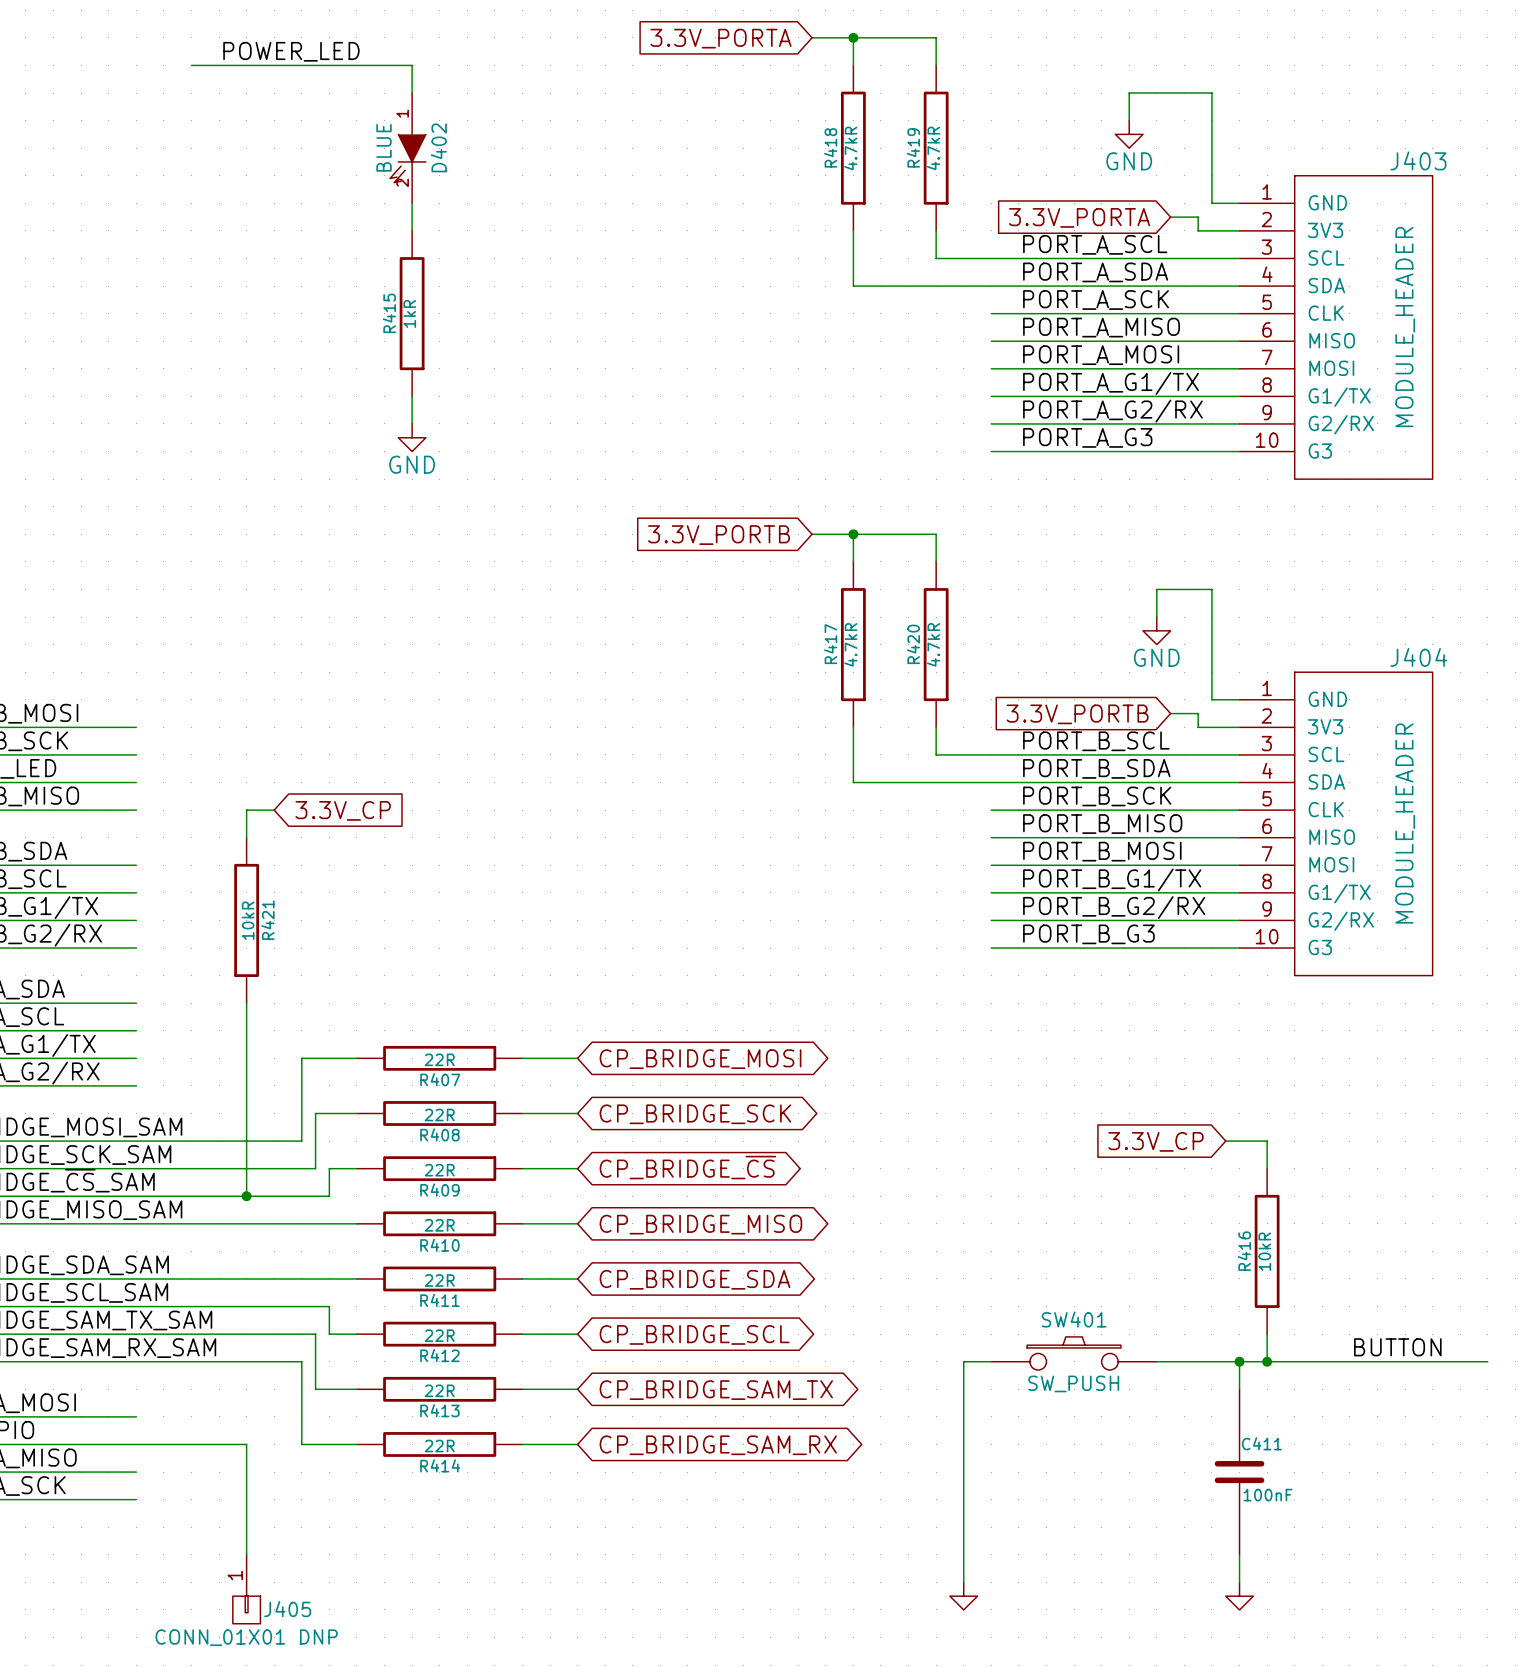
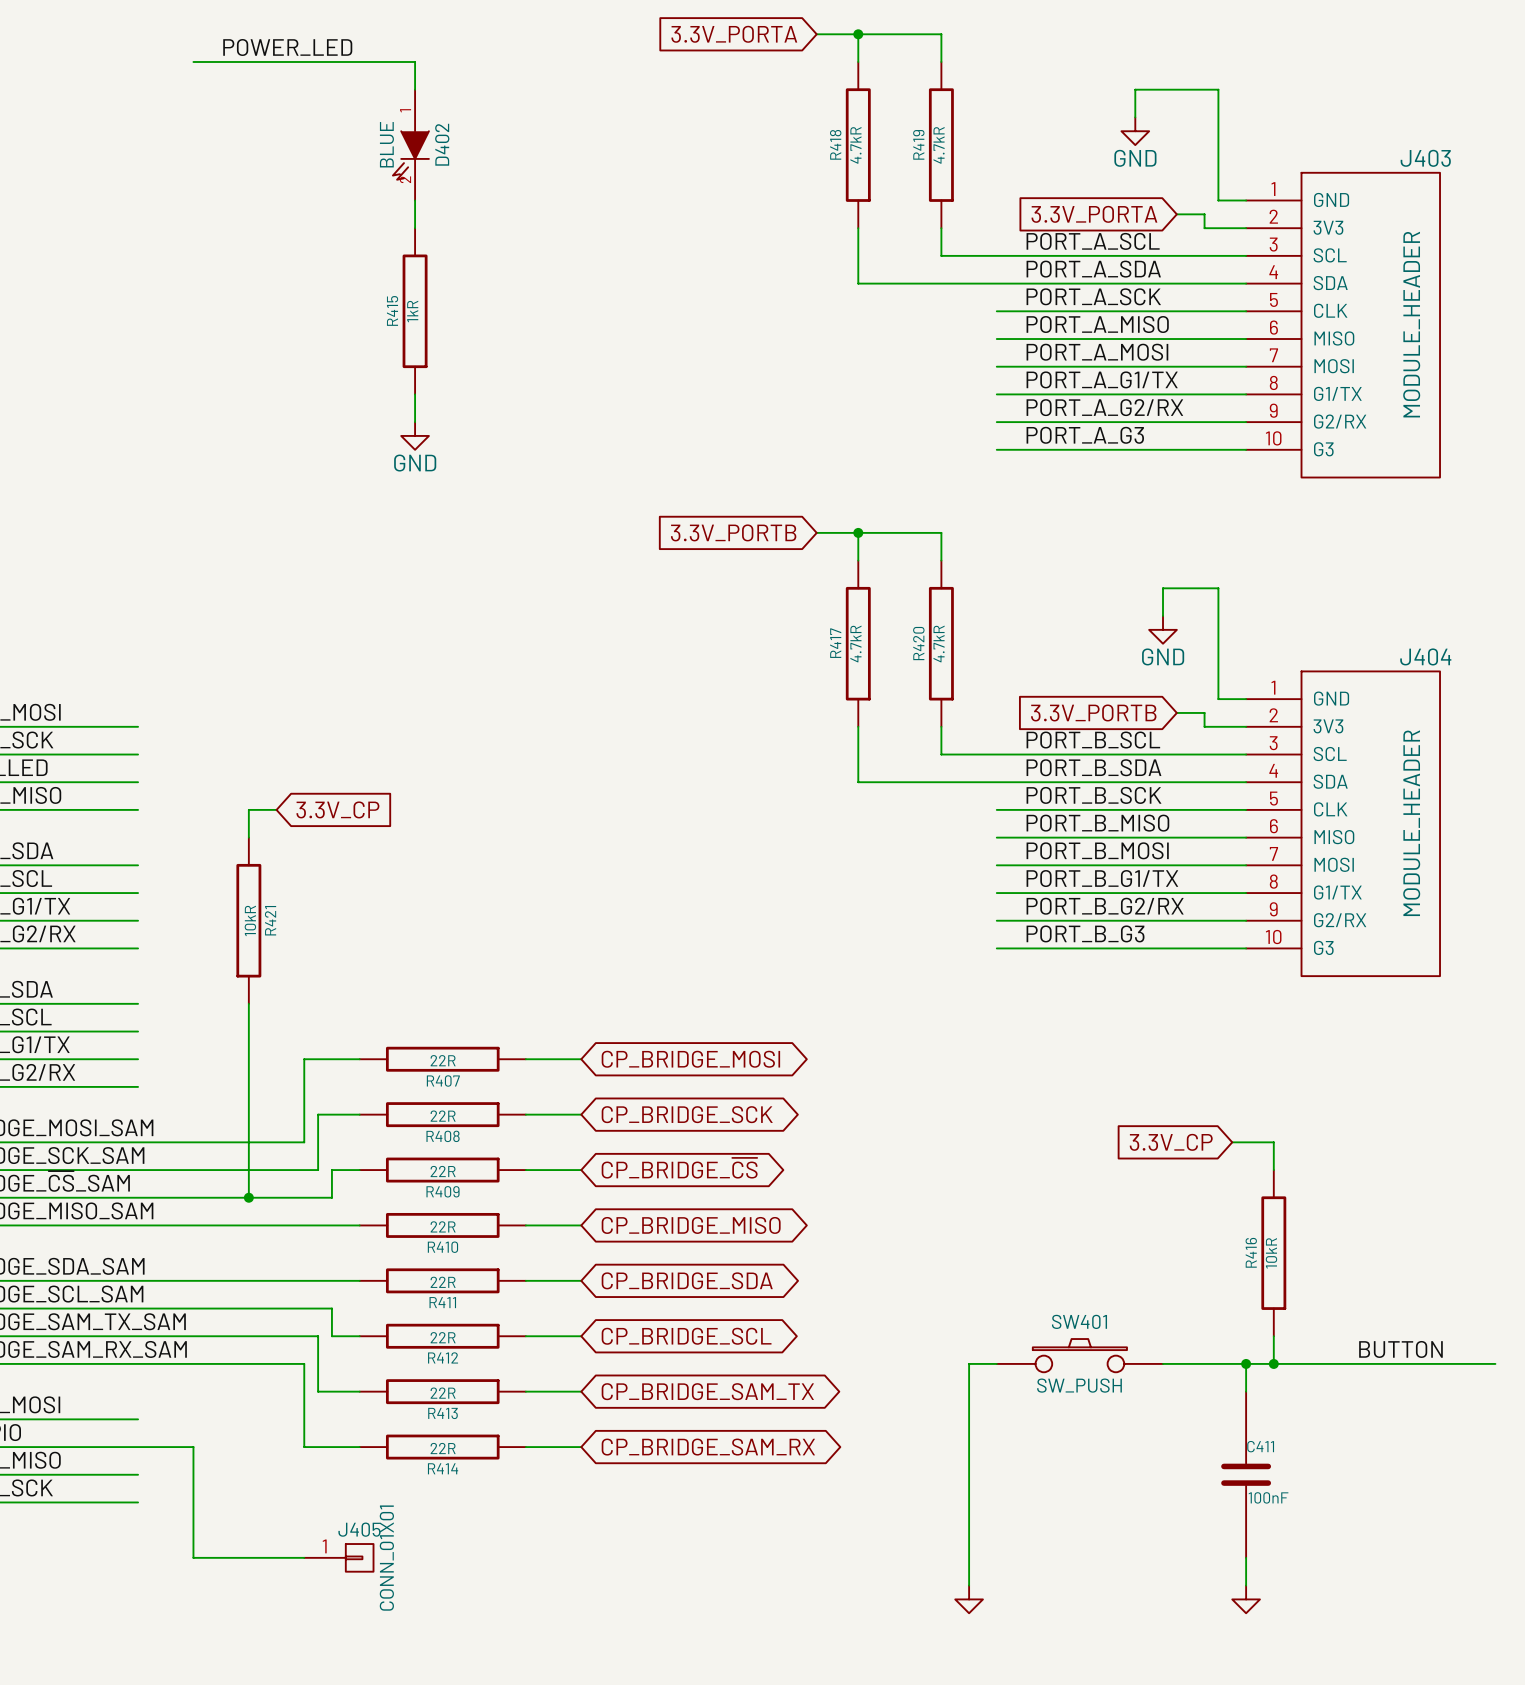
wire: (191, 1444) (246, 1444) (246, 1554) -> (193, 1447) (193, 1557) (304, 1557)
J405 position: (246, 1589) -> (338, 1557)
J405 rotation: 0° (246, 1609) -> 90° counterclockwise (359, 1557)
J405 value: CONN_01X01 DNP (246, 1637) -> CONN_01X01 (386, 1558)

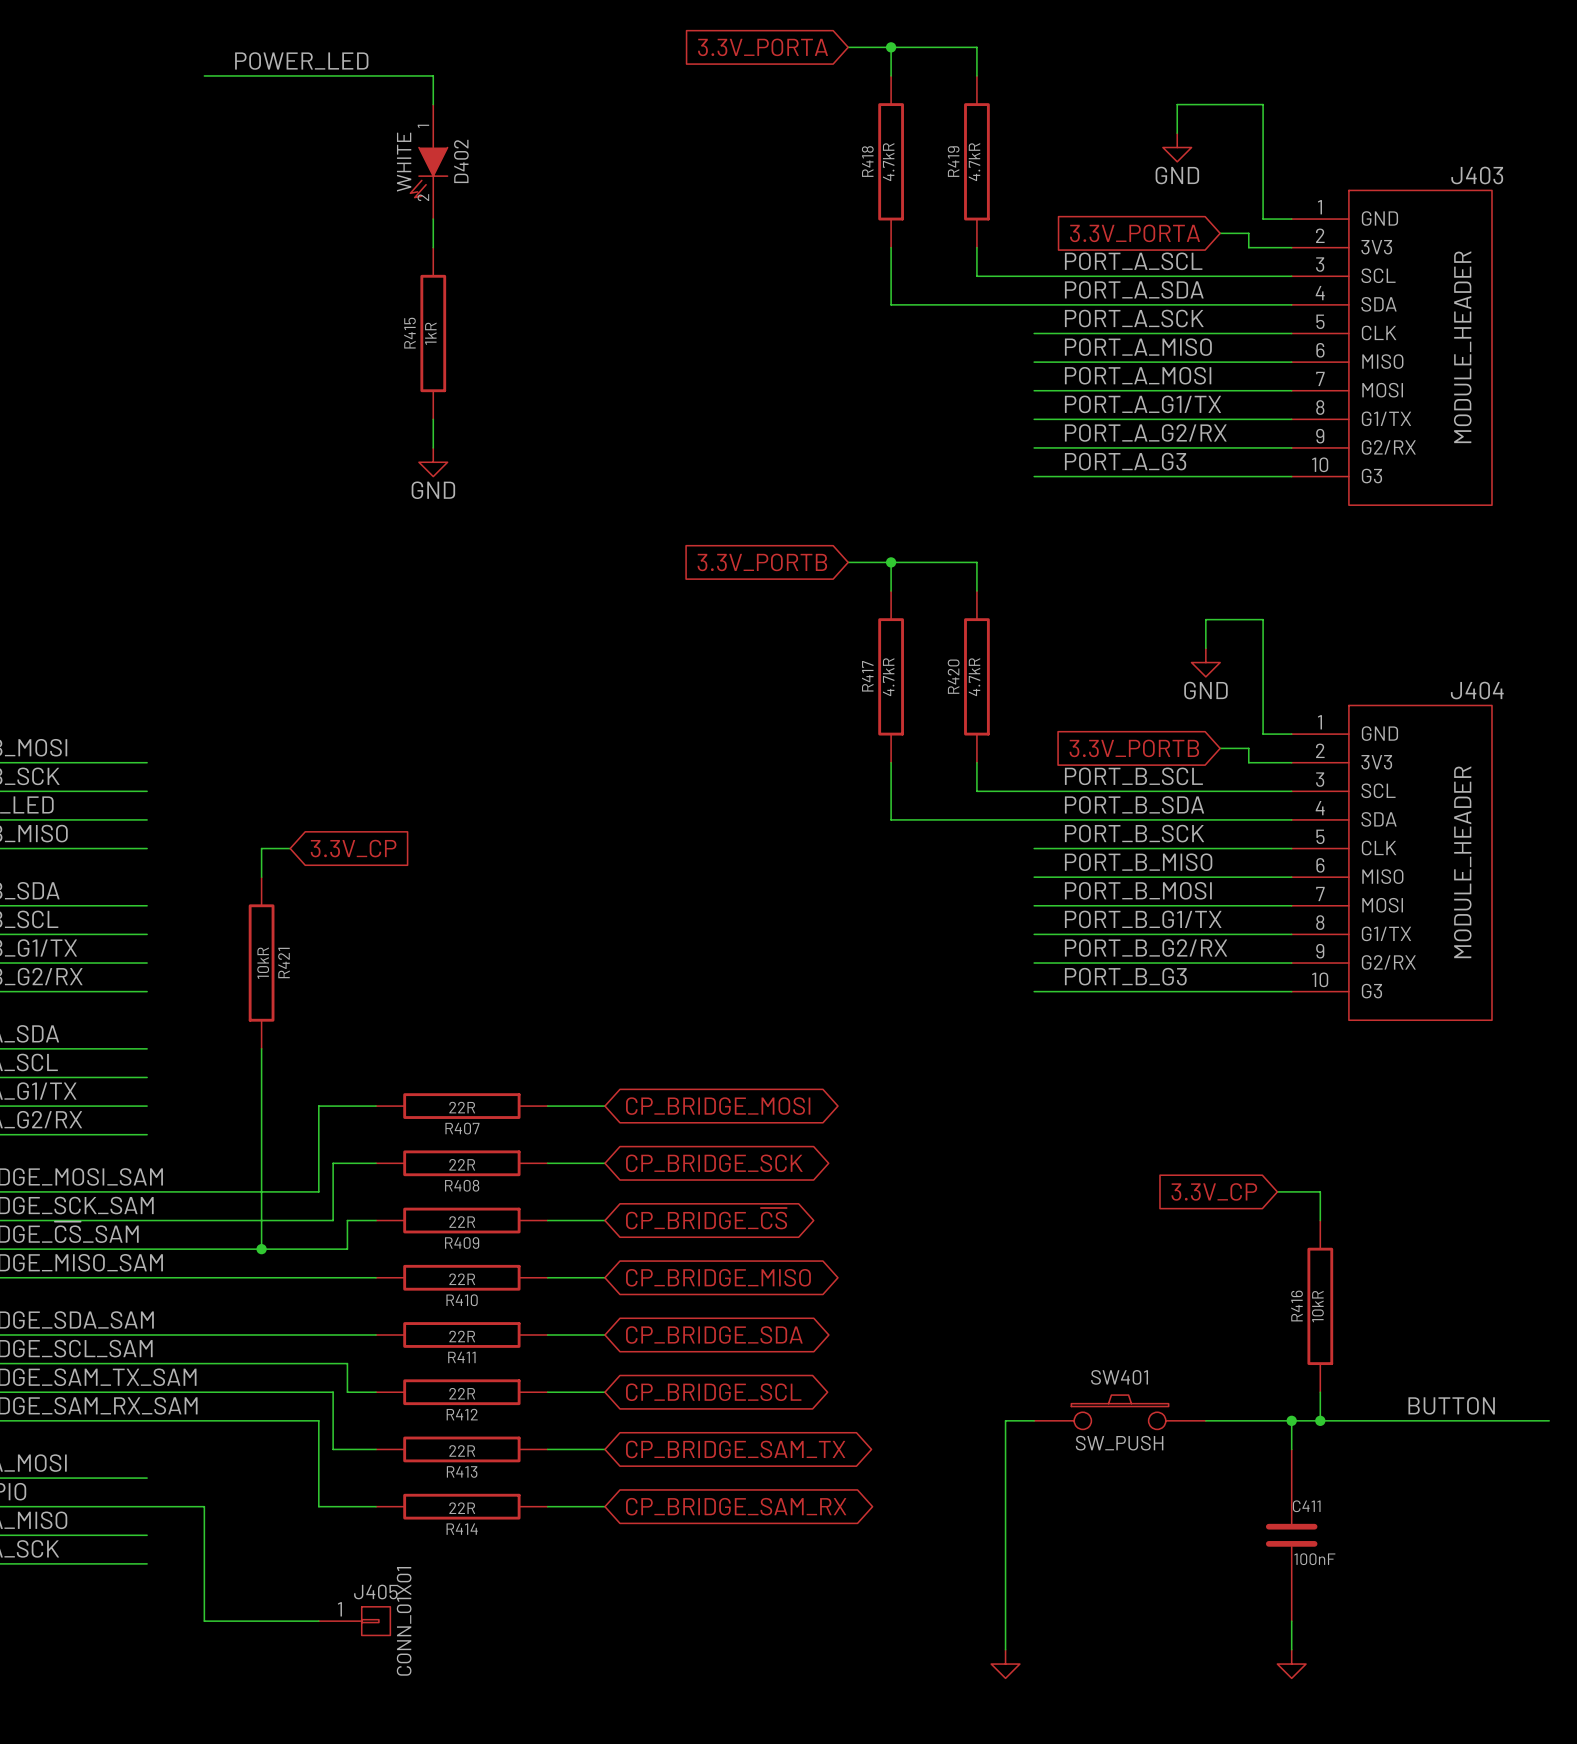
D402 value: BLUE (386, 144) -> WHITE (404, 162)

